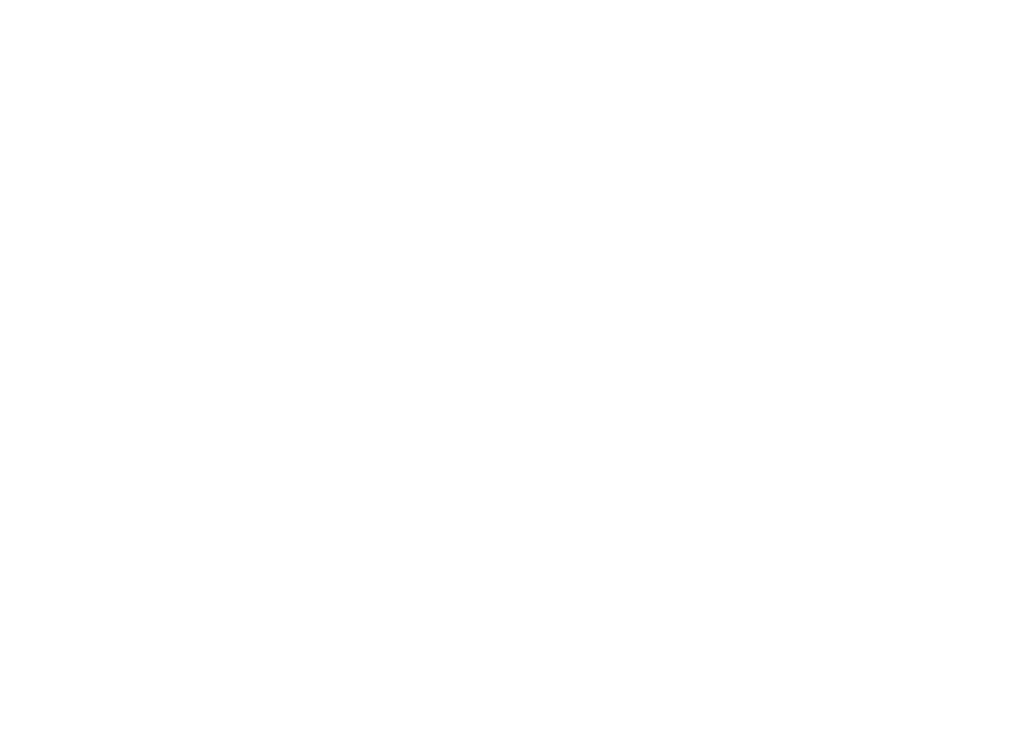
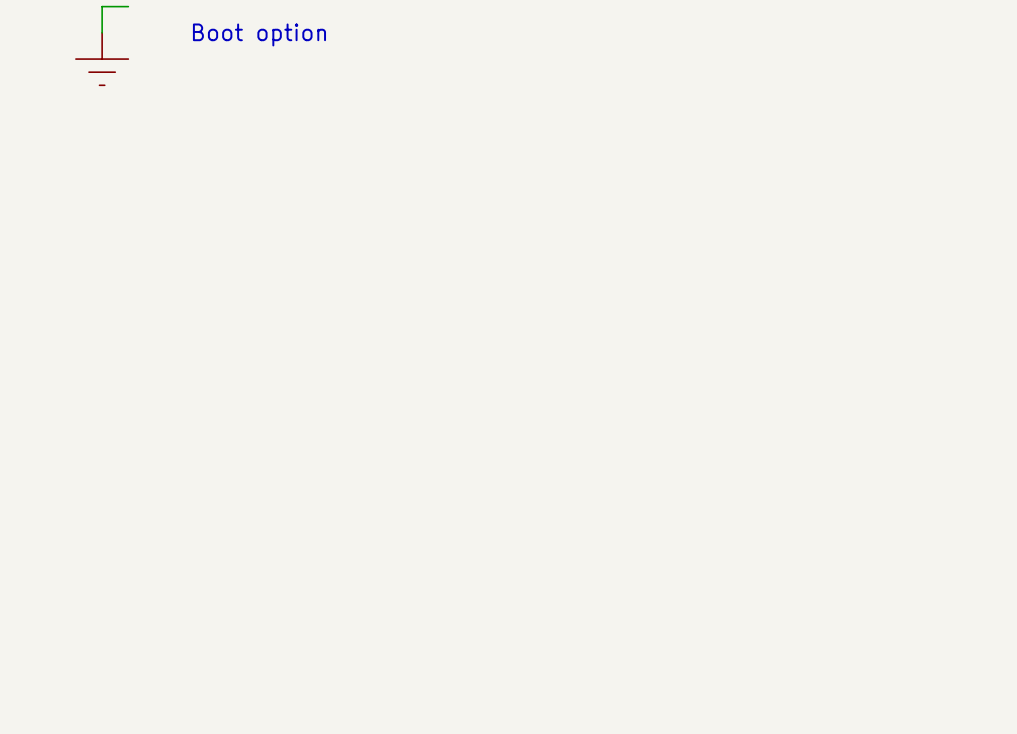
wire: none -> (128, 6) (102, 6) (102, 32)
text: none -> Boot option (259, 34)
power symbol: none -> (102, 59)

